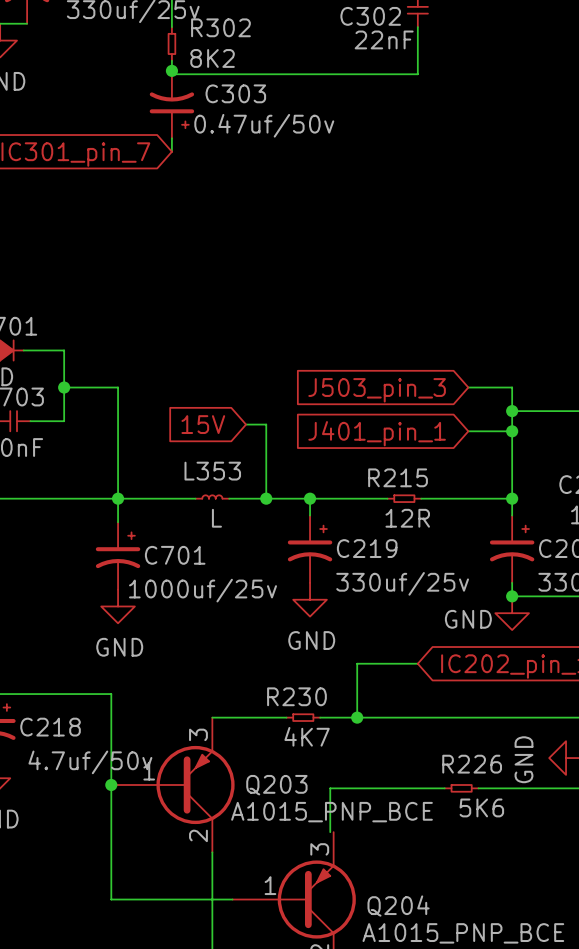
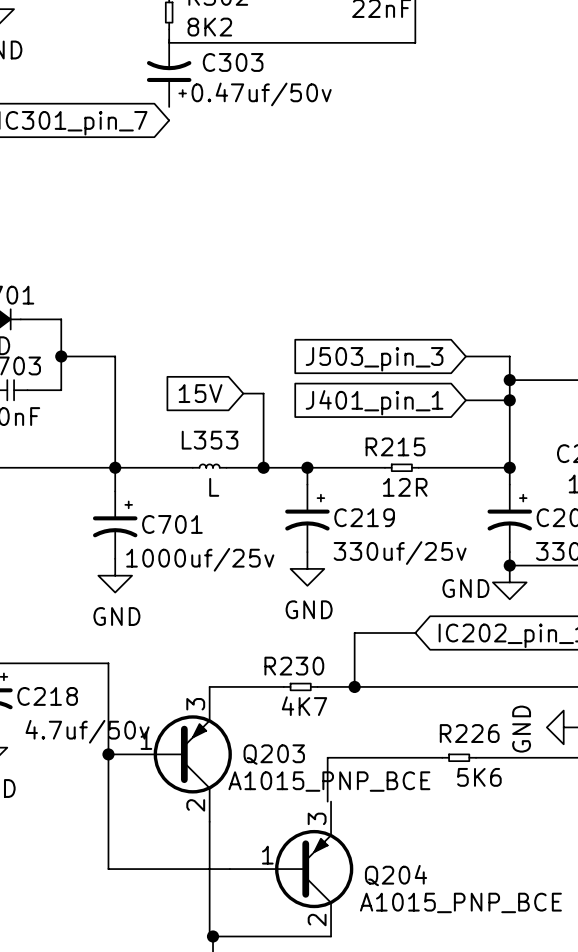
junction: (171, 70) -> none
wire: (171, 138) (171, 151) -> none

